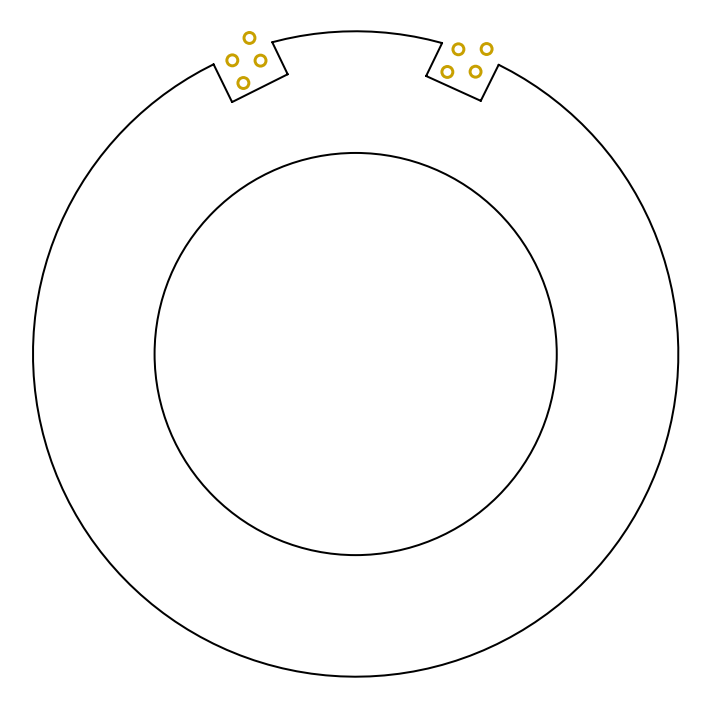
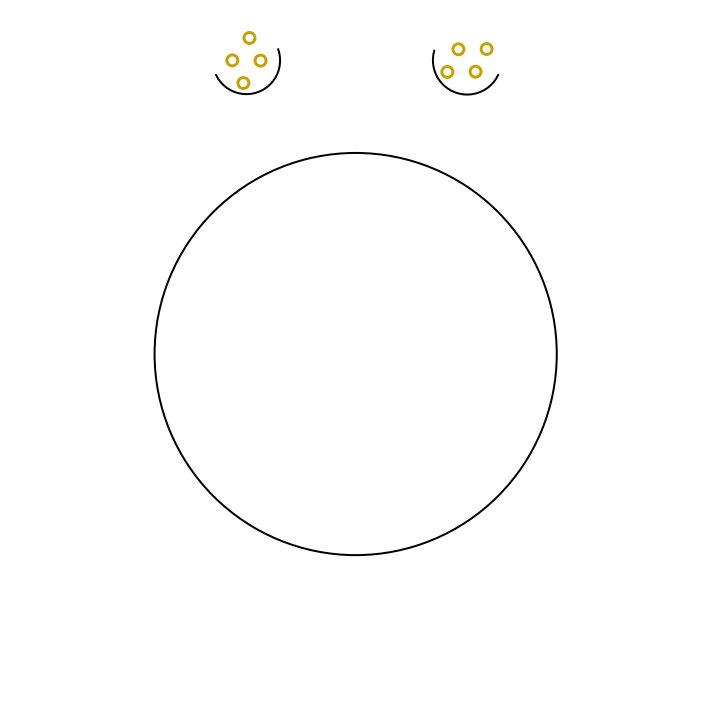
board edge: (442, 43) (400, 34) (357, 31) (314, 33) (272, 42) (287, 74) (232, 102) (213, 64) (187, 78) (140, 113) (110, 144) (92, 167) (62, 218) (43, 274) (33, 331) (35, 390) (46, 447) (62, 489) (76, 515) (91, 539) (119, 574) (163, 613) (213, 643) (268, 664) (296, 671) (340, 676) (399, 673) (456, 660) (510, 637) (535, 622) (569, 595) (610, 552) (641, 503) (654, 476) (668, 434) (677, 376) (676, 318) (664, 260) (649, 219) (635, 193) (611, 157) (582, 124) (548, 95) (511, 71) (498, 64) (480, 100) (426, 76) (442, 43) -> none
board edge: none -> (278, 49) (280, 61) (277, 74) (269, 84) (259, 91) (246, 94) (234, 91) (223, 85) (215, 74)
board edge: none -> (434, 50) (433, 63) (436, 75) (444, 85) (455, 92) (467, 94) (480, 92) (490, 85) (498, 74)

